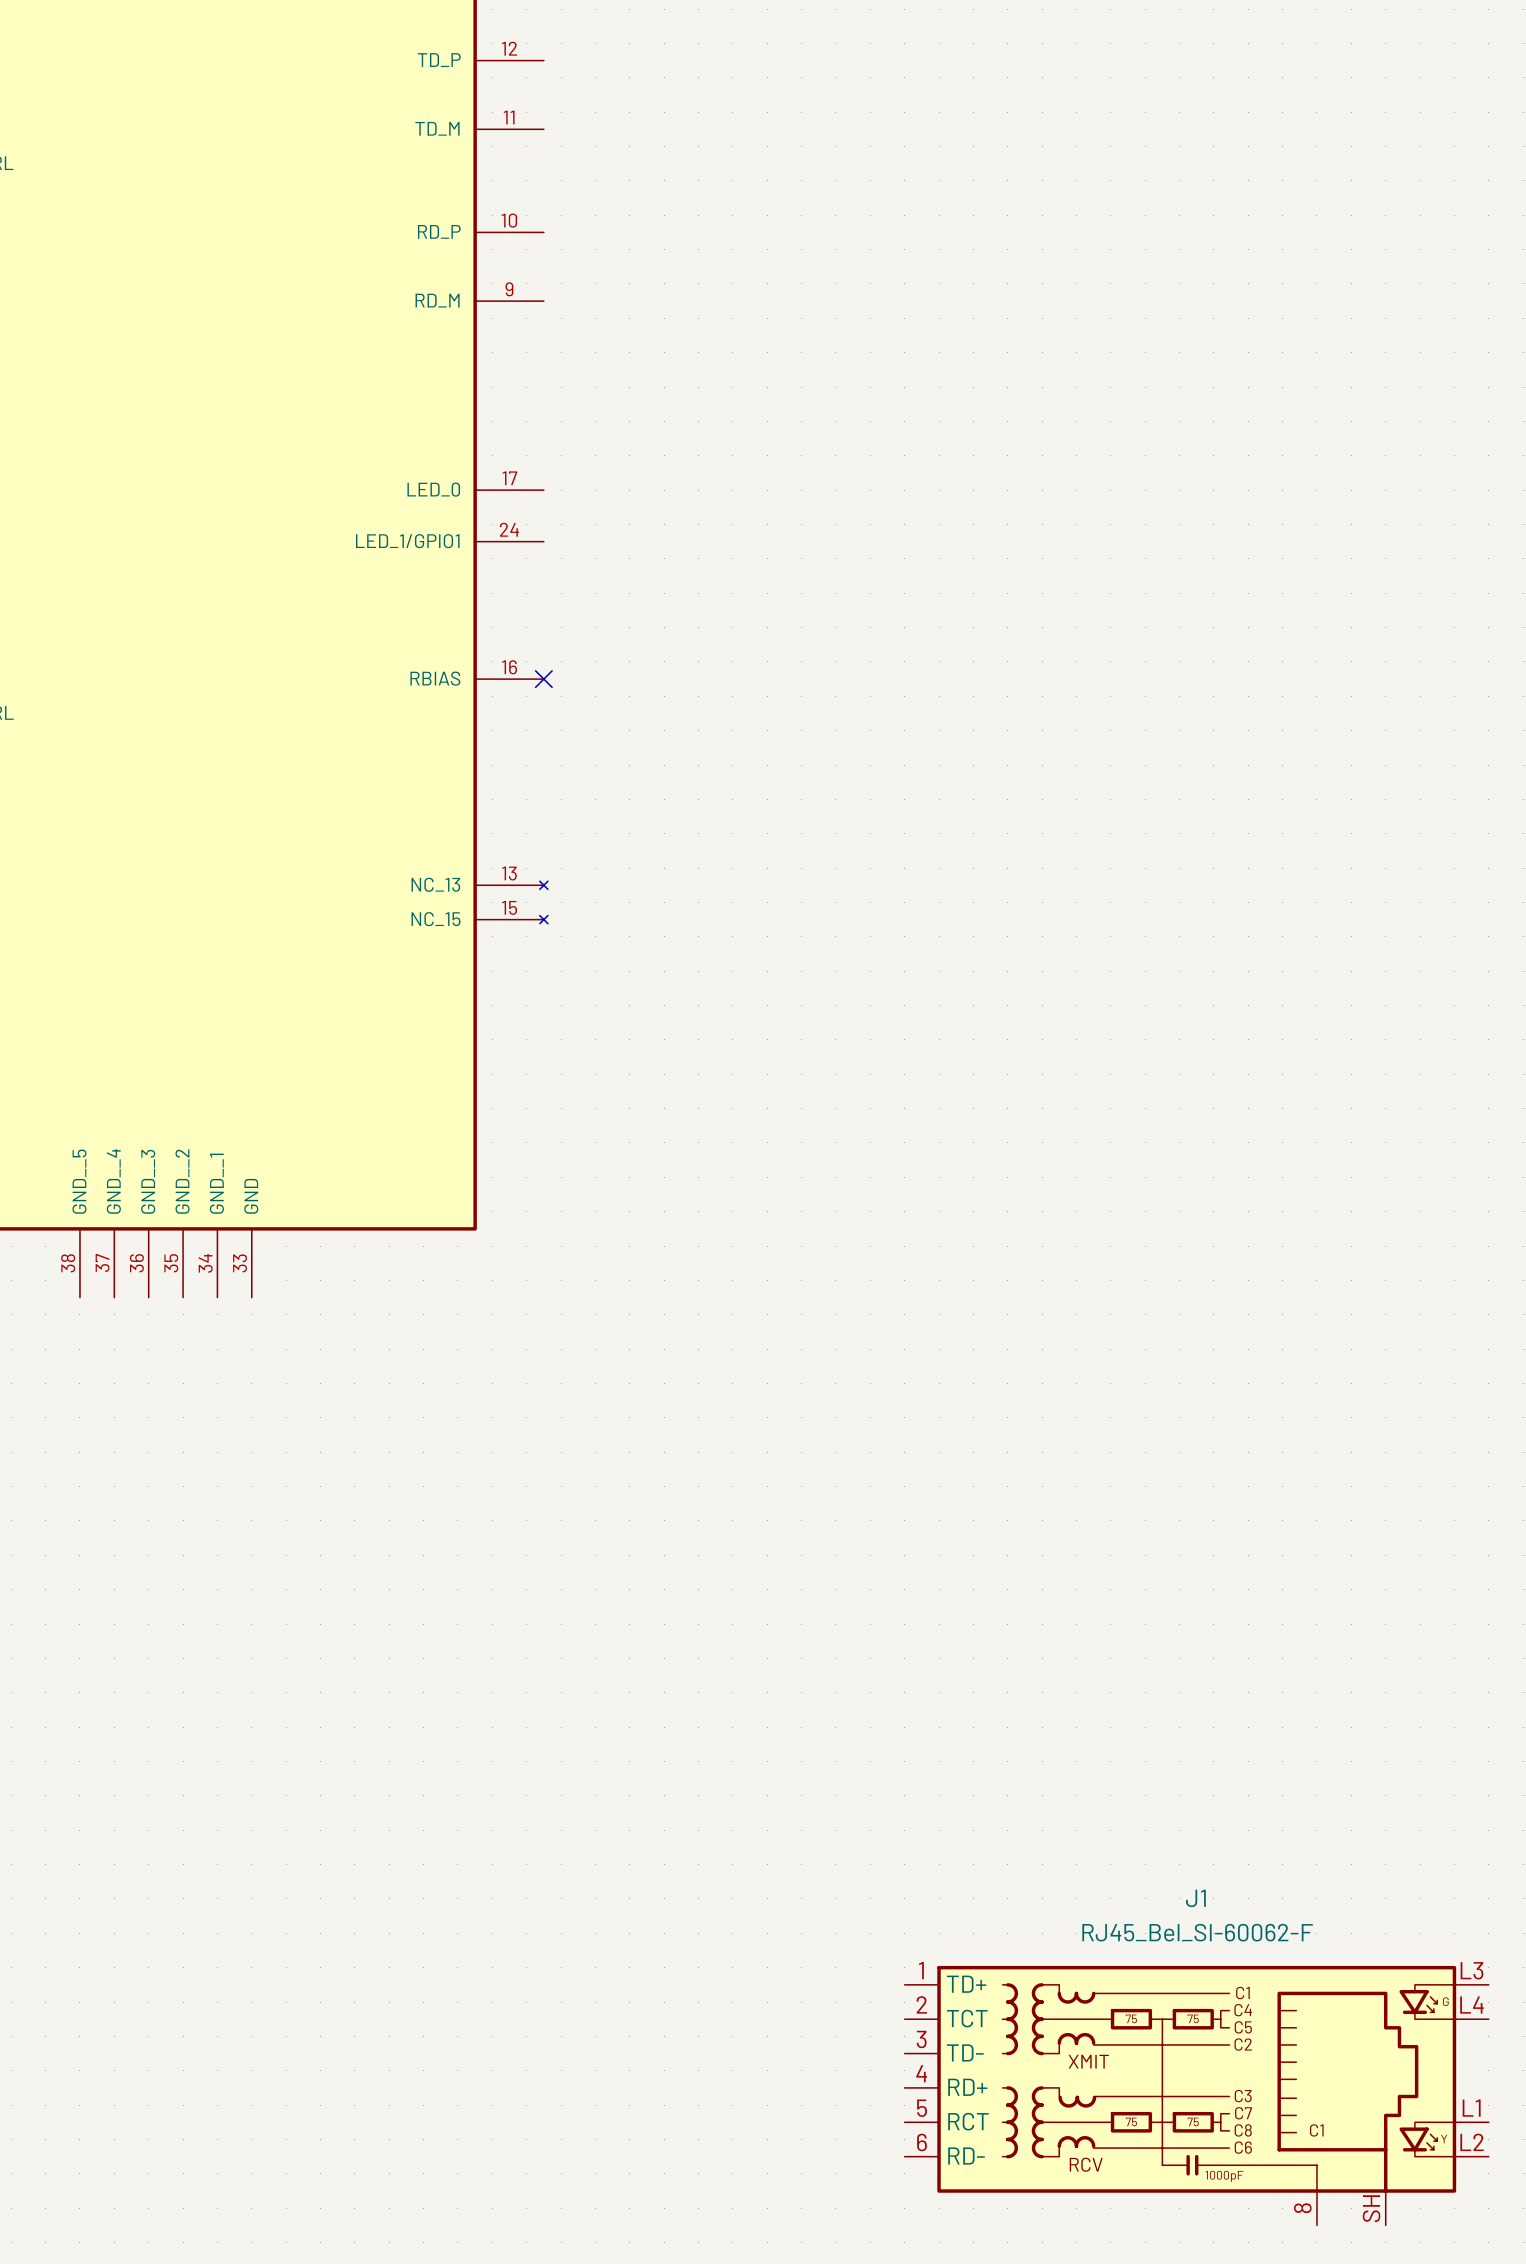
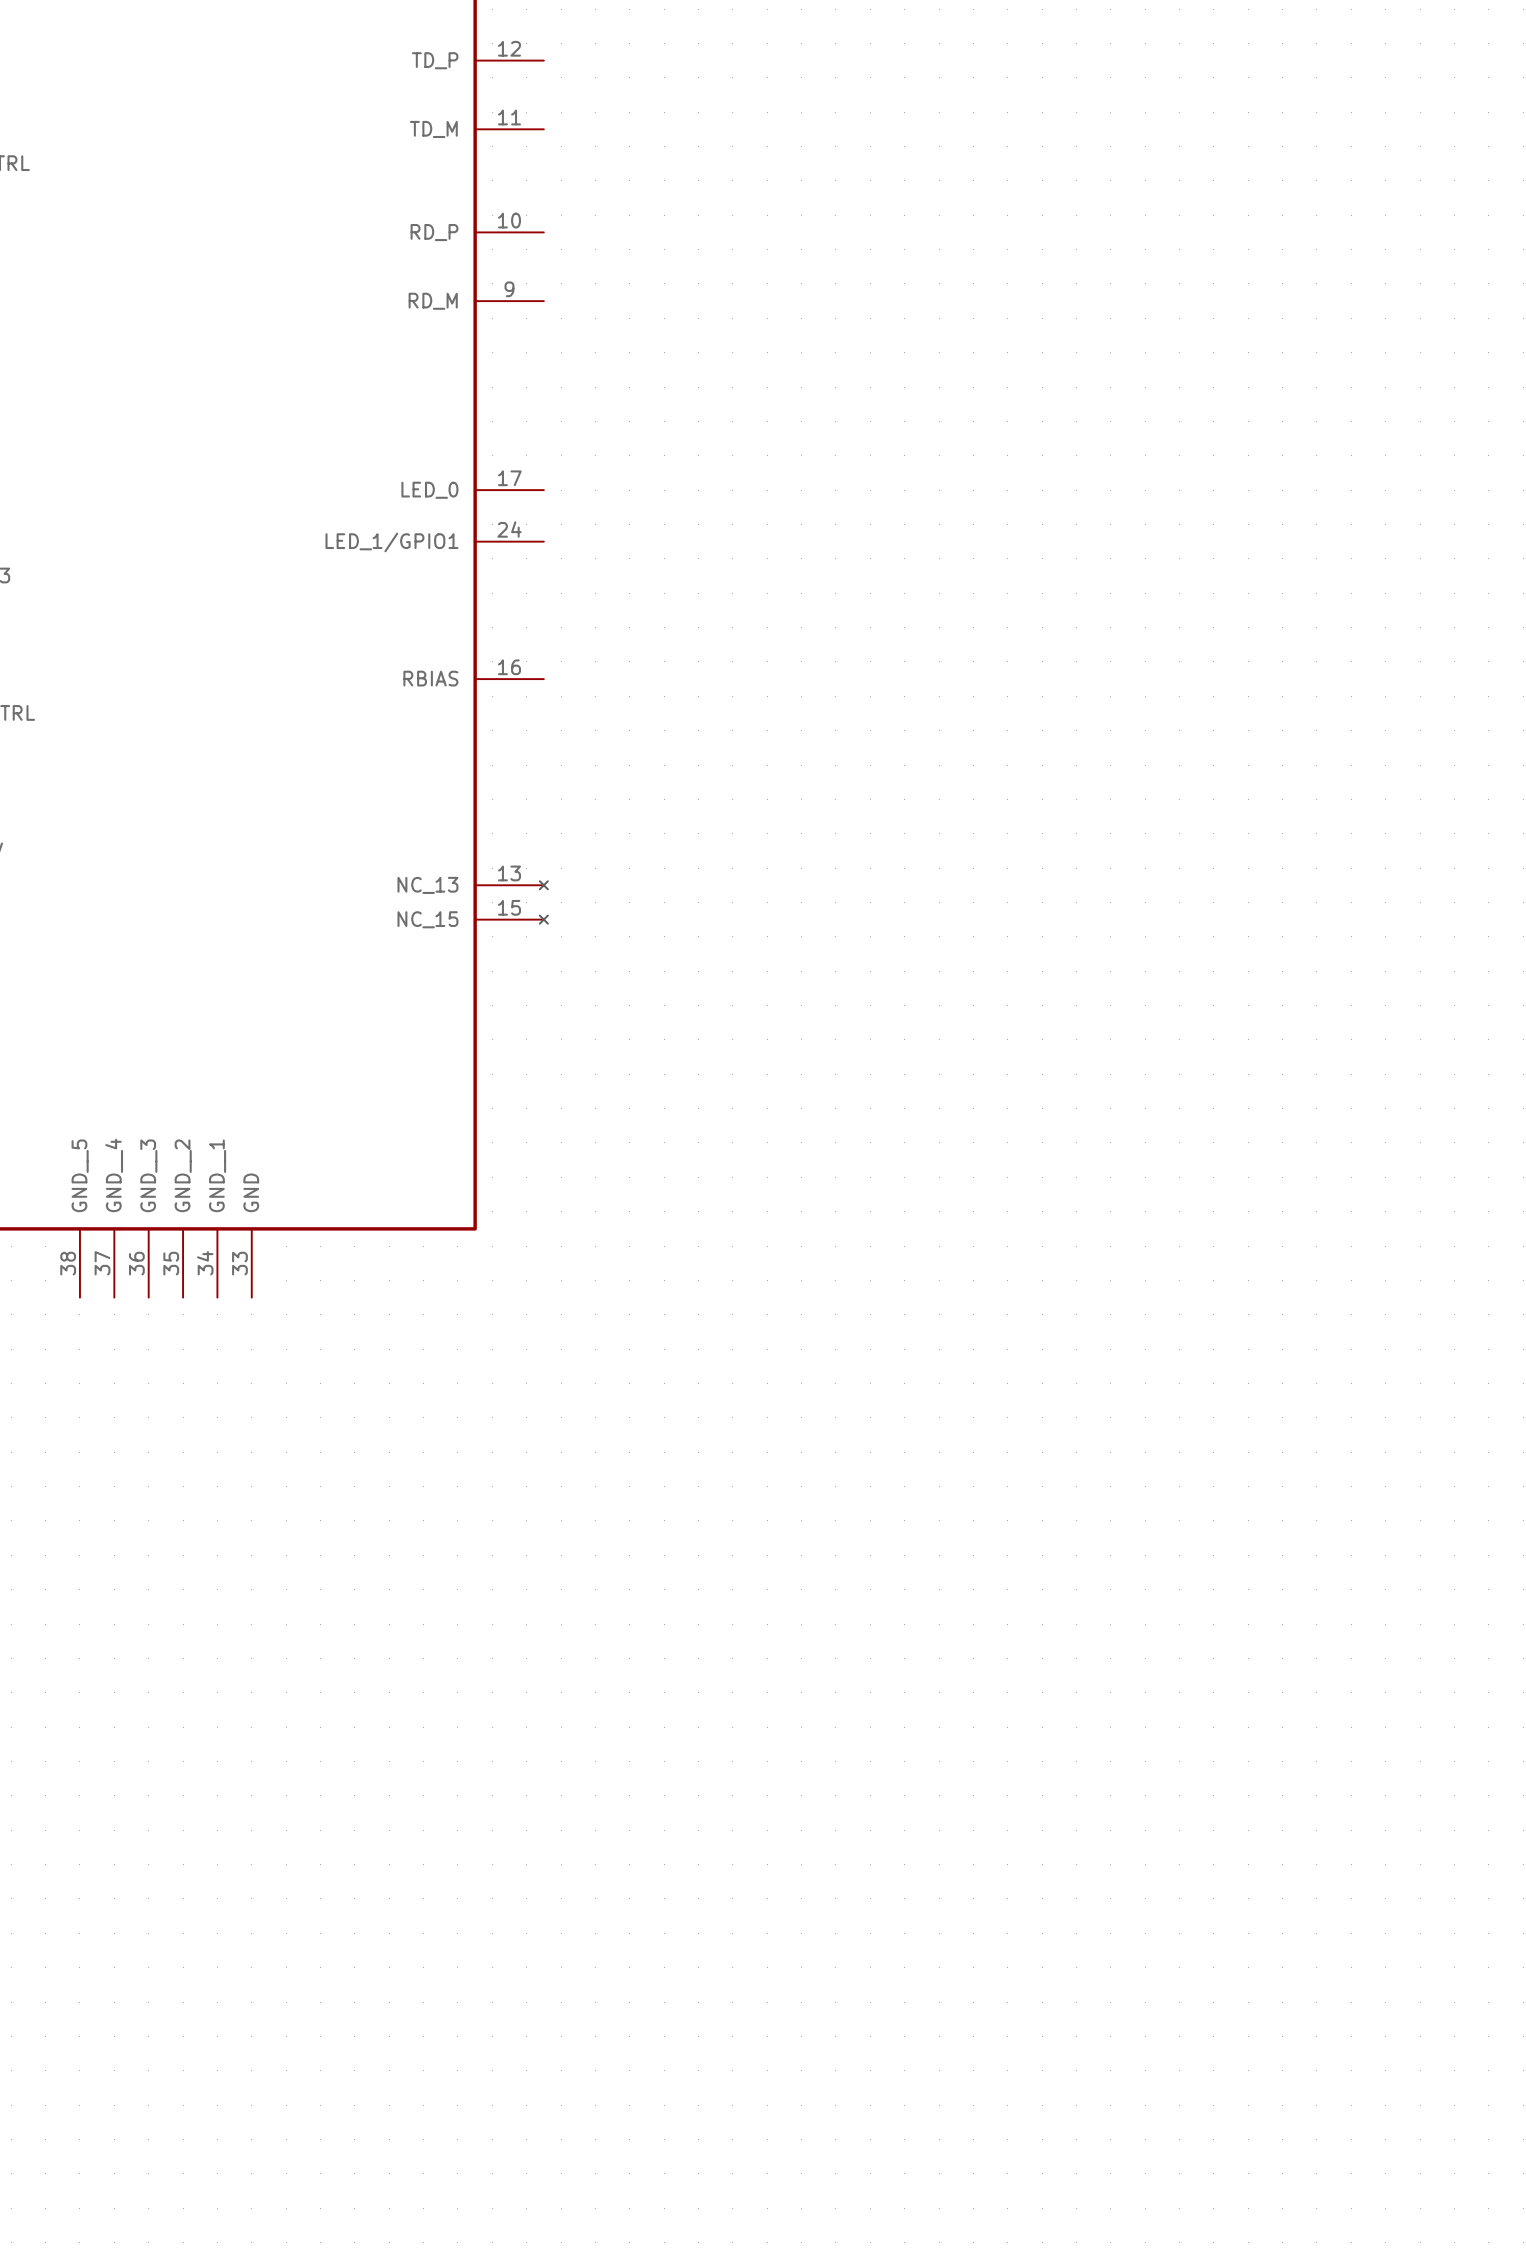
no-connect mark: (543, 679) -> none
J1: RJ45_Bel_SI-60062-F (1196, 2095) -> none

